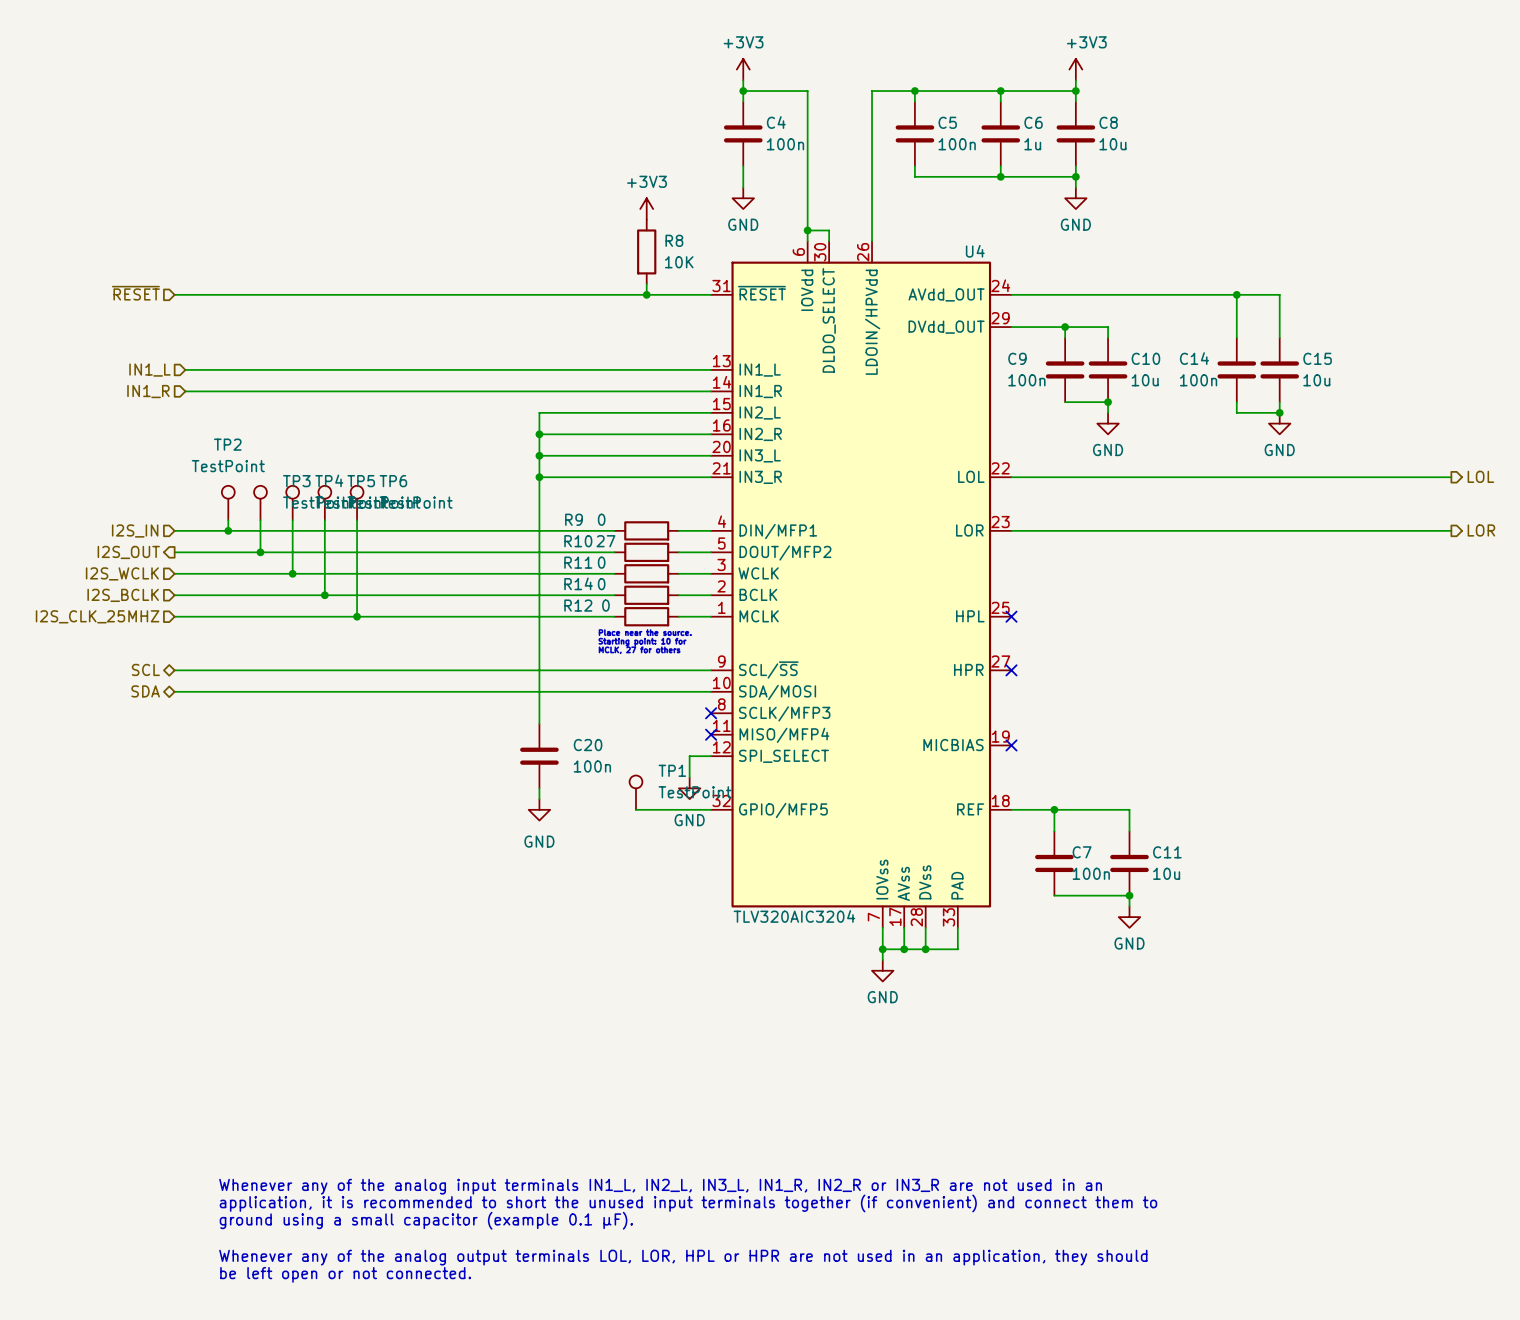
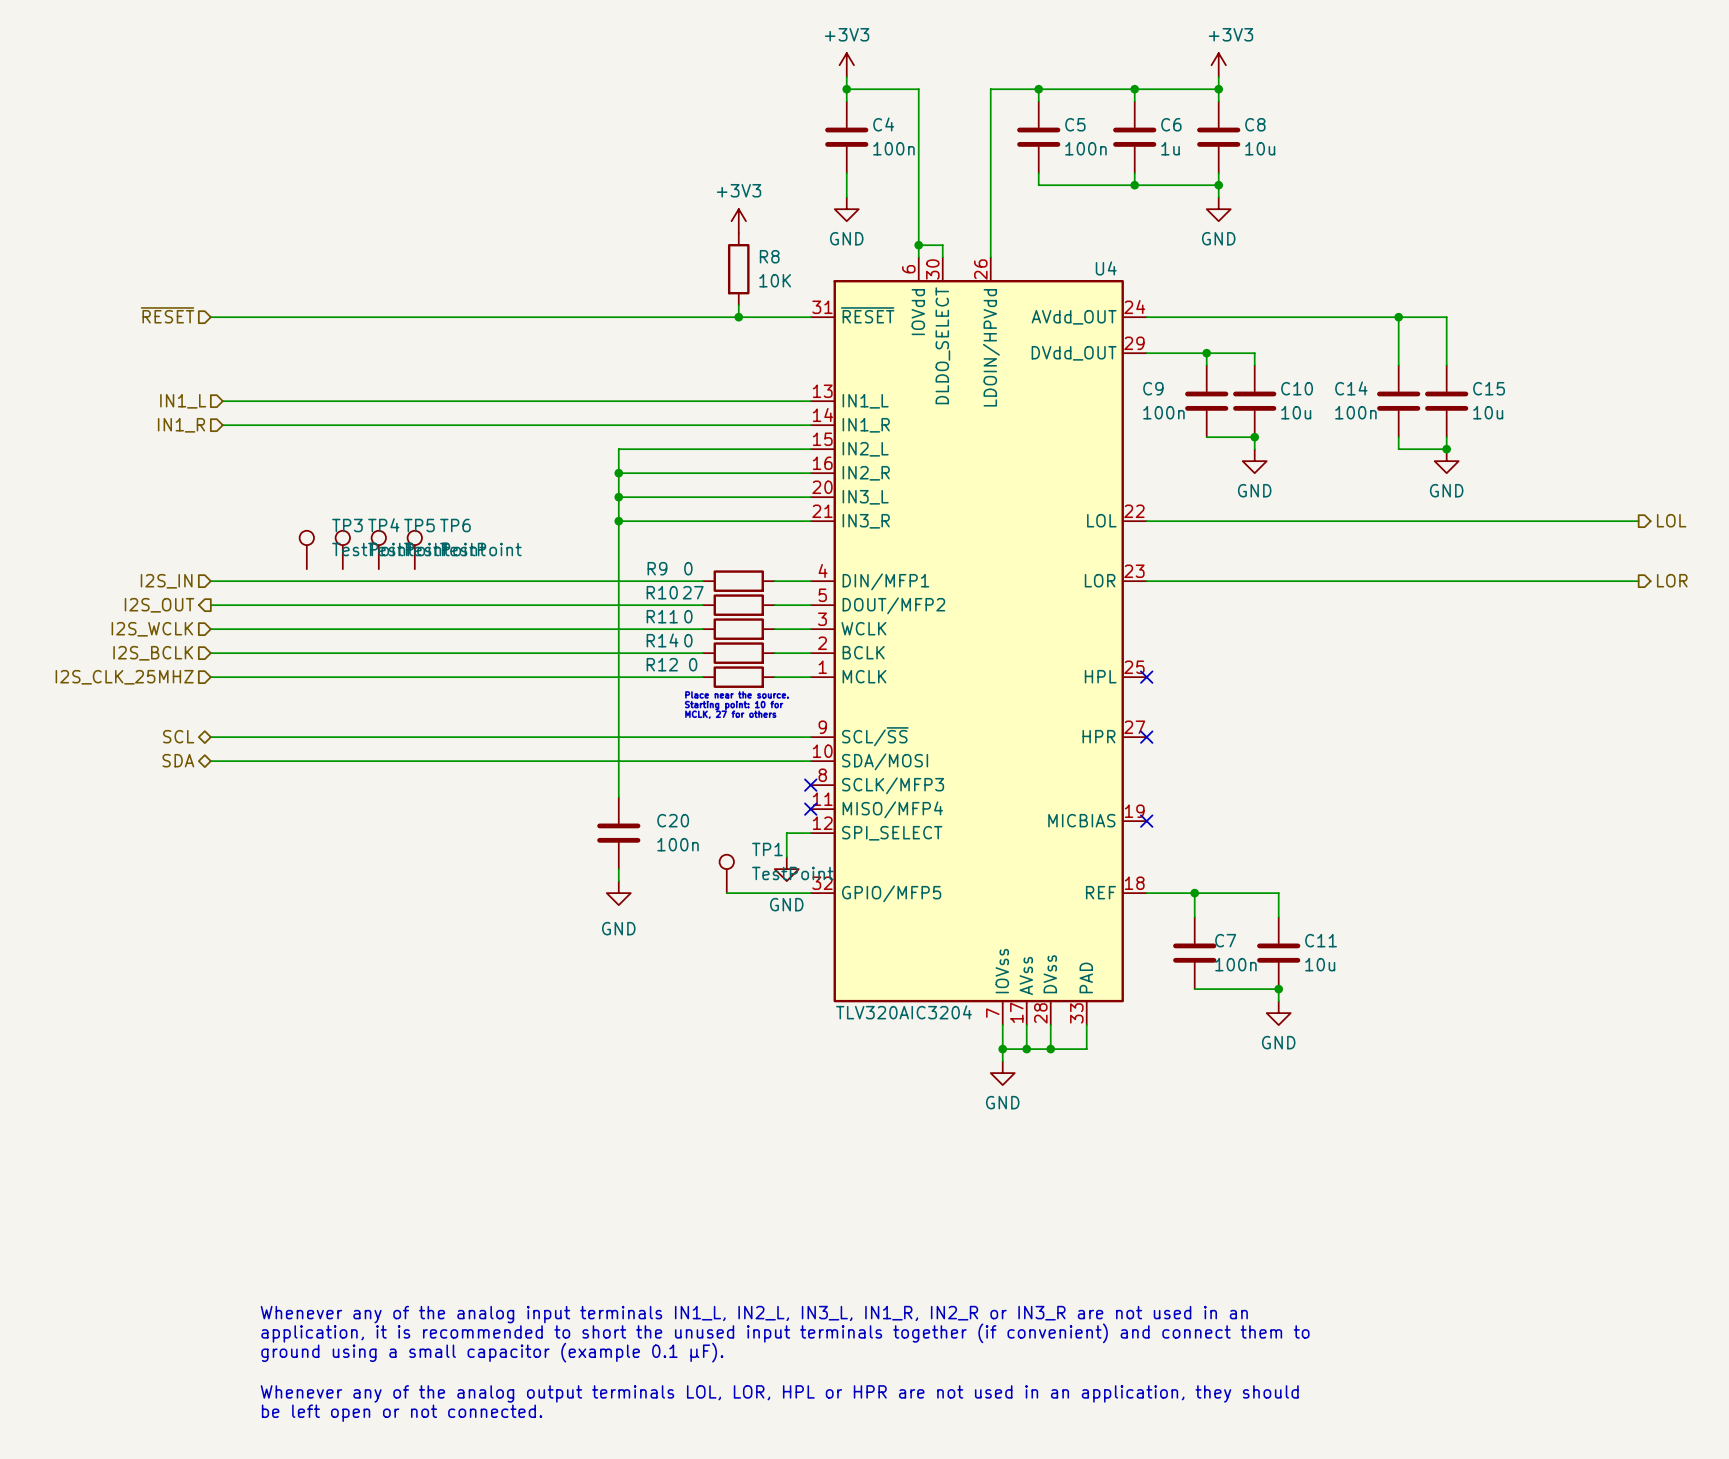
TP2: TestPoint (228, 502) -> none
wire: (228, 520) (228, 530) -> none
wire: (260, 520) (260, 552) -> none
wire: (292, 520) (292, 573) -> none
wire: (324, 520) (324, 595) -> none
wire: (357, 520) (357, 616) -> none
junction: (228, 530) -> none
junction: (260, 552) -> none
junction: (292, 573) -> none
junction: (324, 595) -> none
junction: (357, 616) -> none

